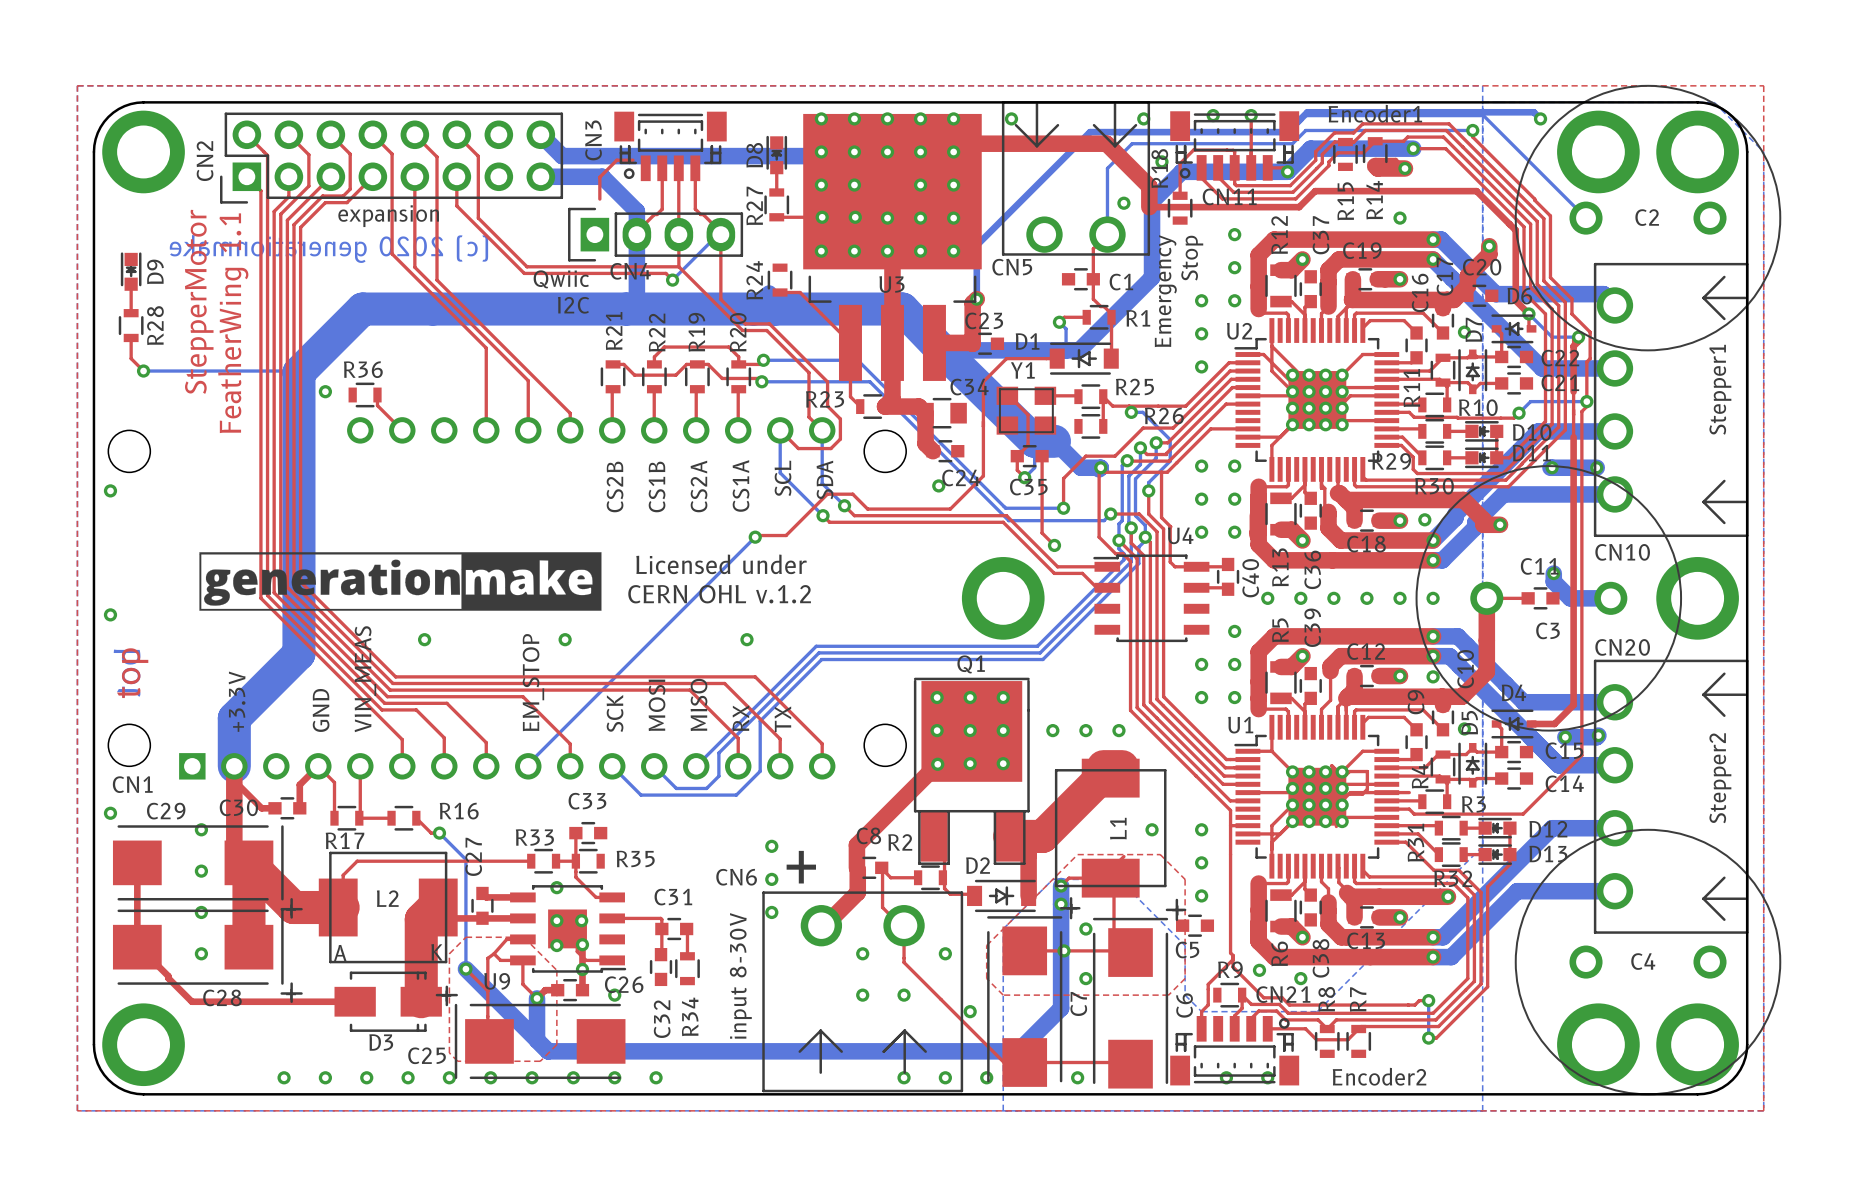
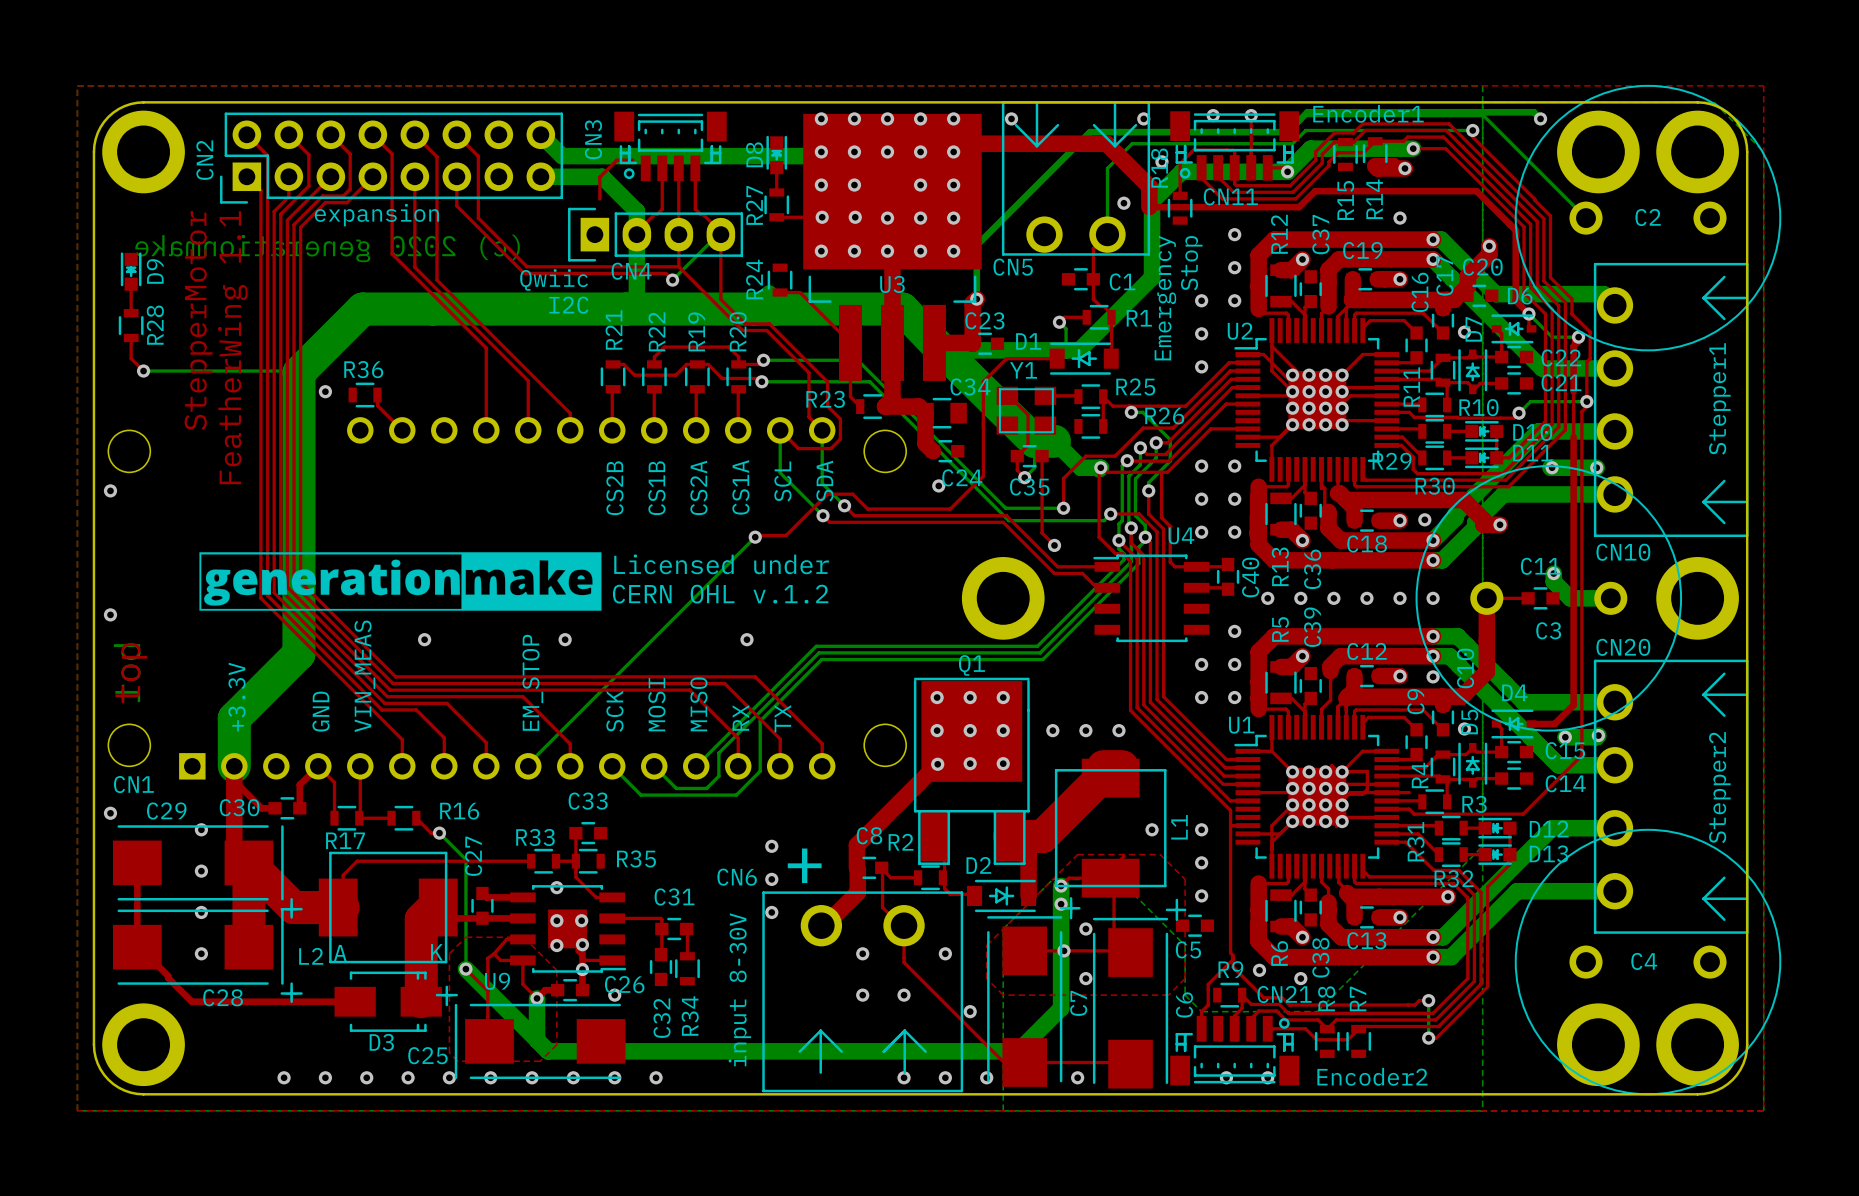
L1 name position: L1 (1118, 828) -> L1 (1179, 827)
L2 name position: L2 (387, 898) -> L2 (311, 956)

